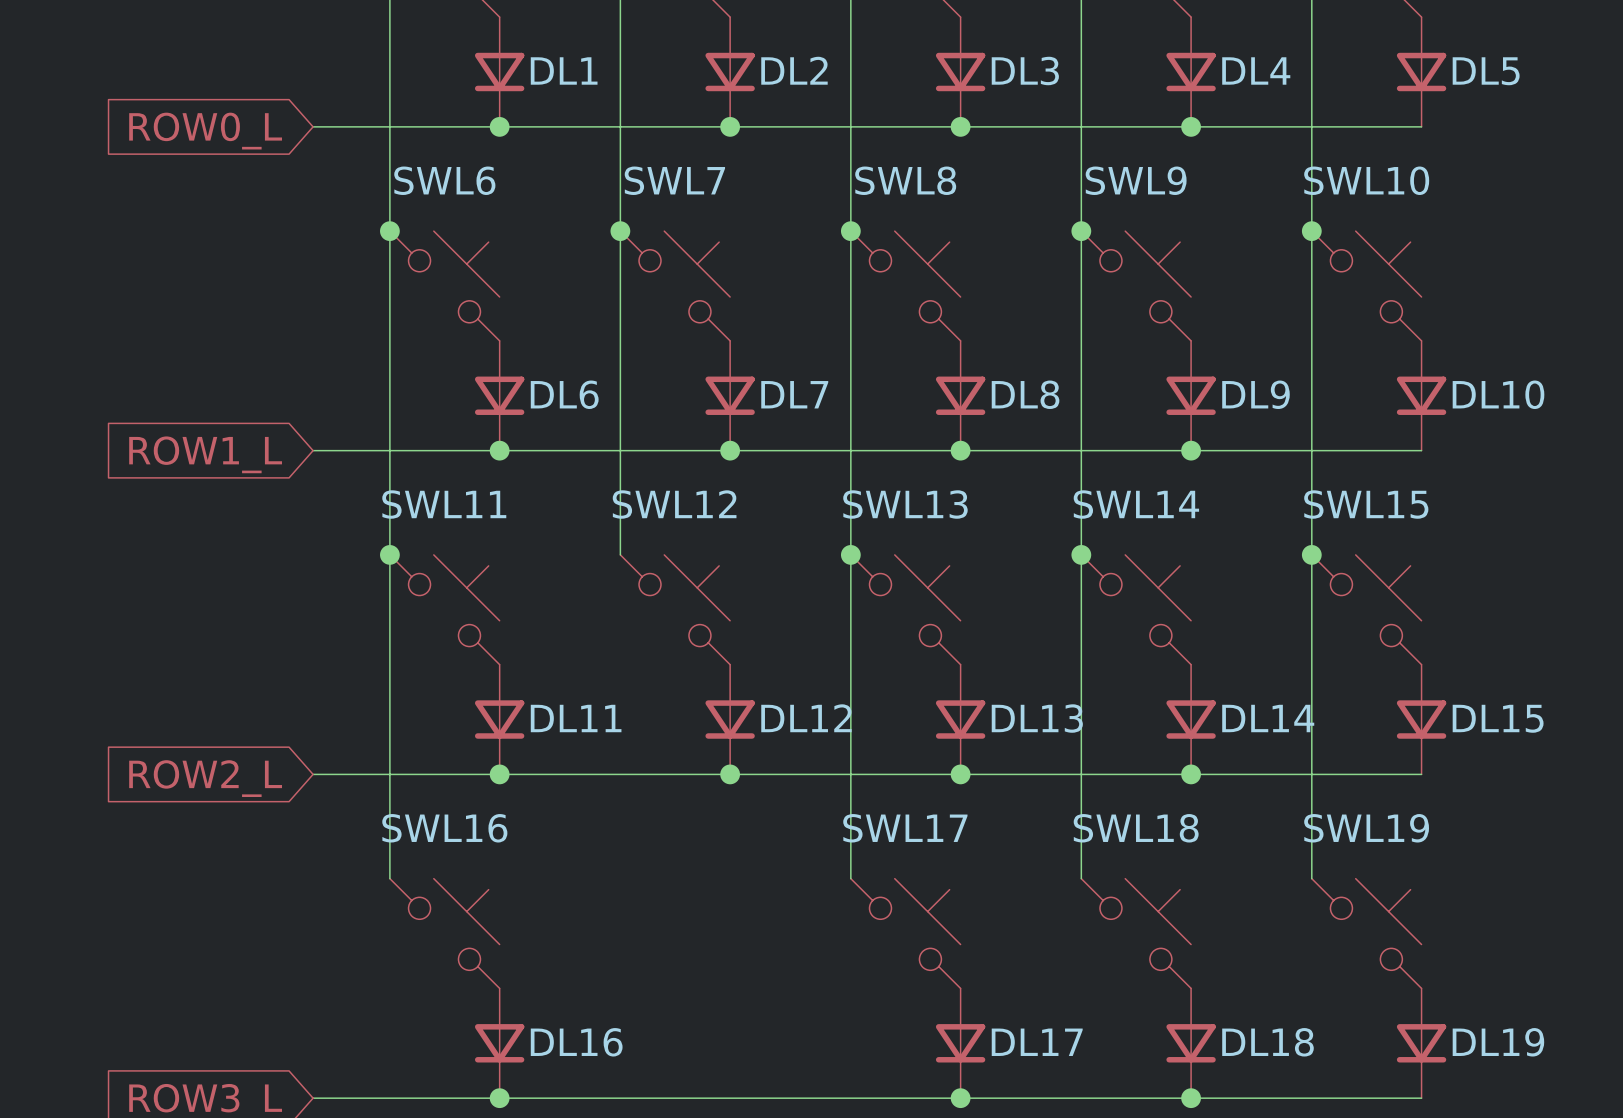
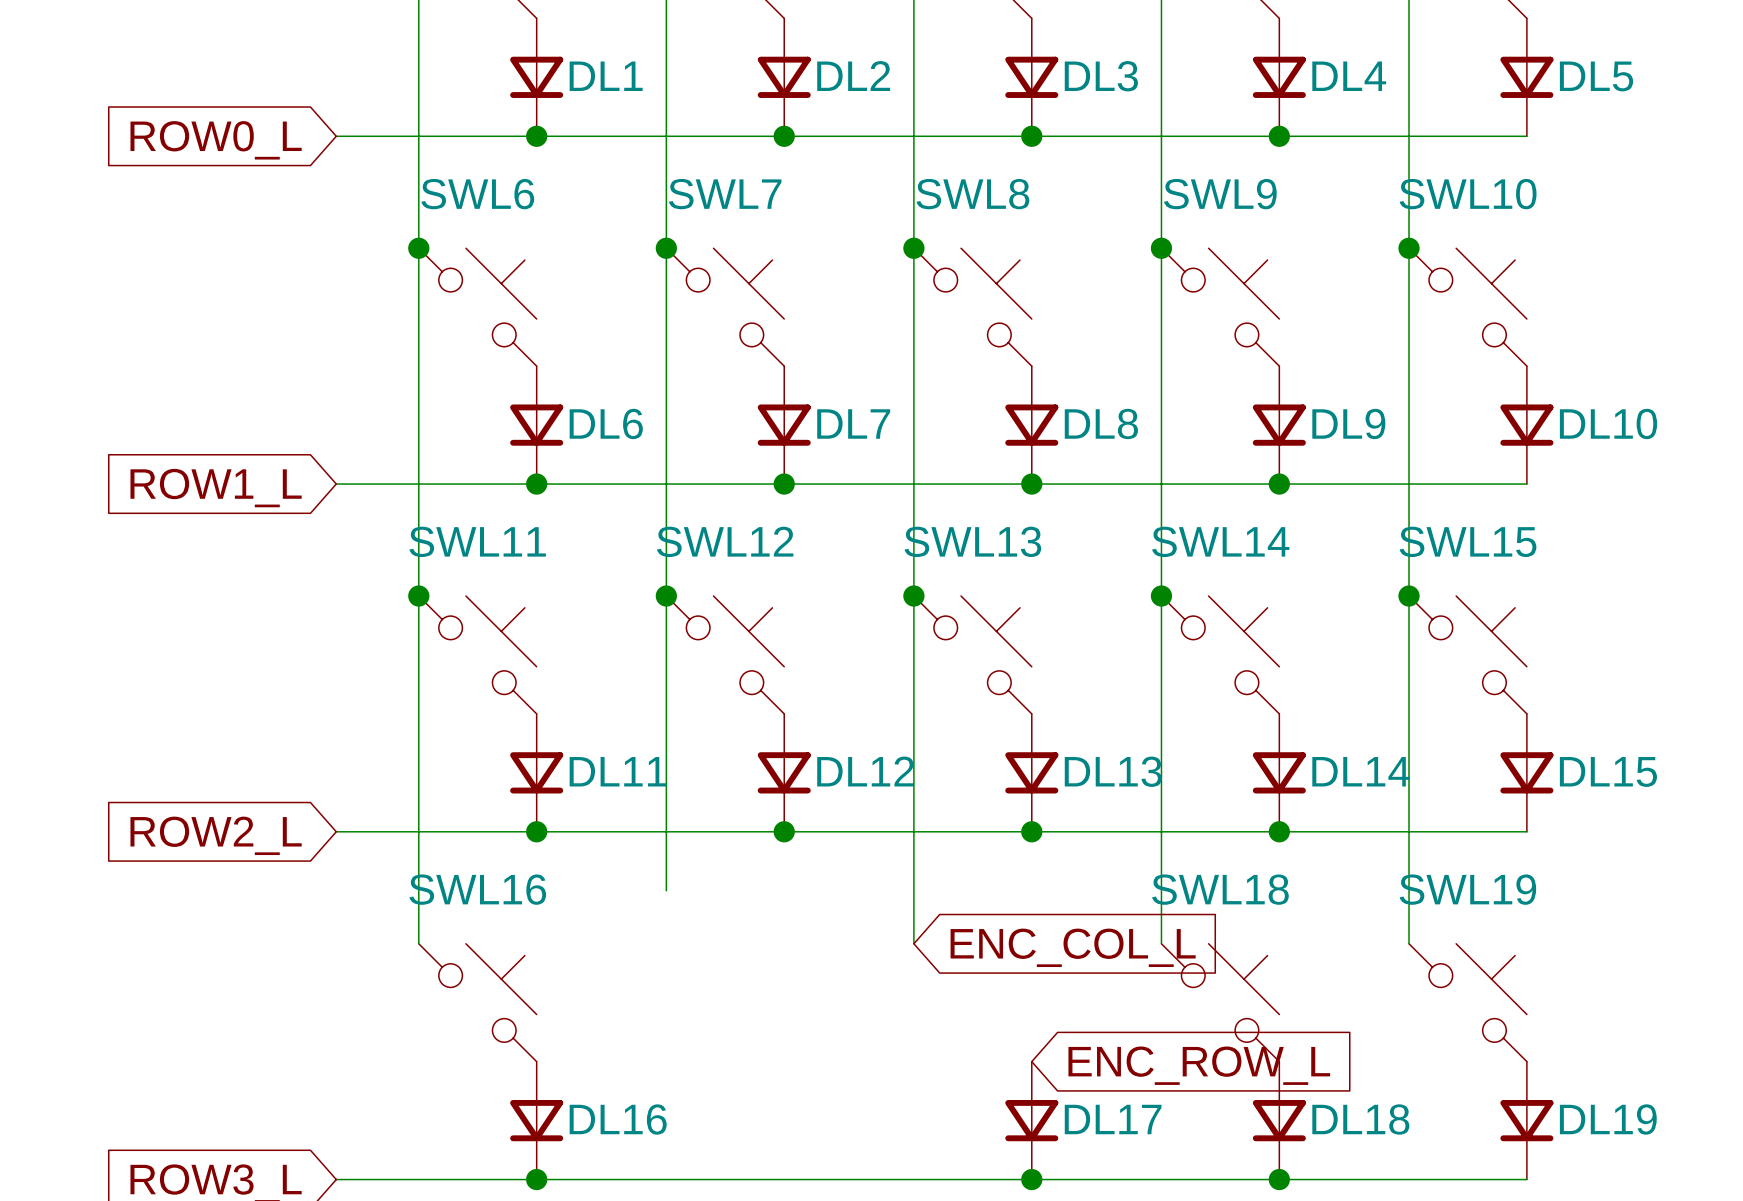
wire: none -> (666, 596) (666, 890)
junction: none -> (666, 596)
global label: none -> ENC_COL_L (1073, 947)
SWL17: (905, 933) -> none
global label: none -> ENC_ROW_L (1199, 1065)

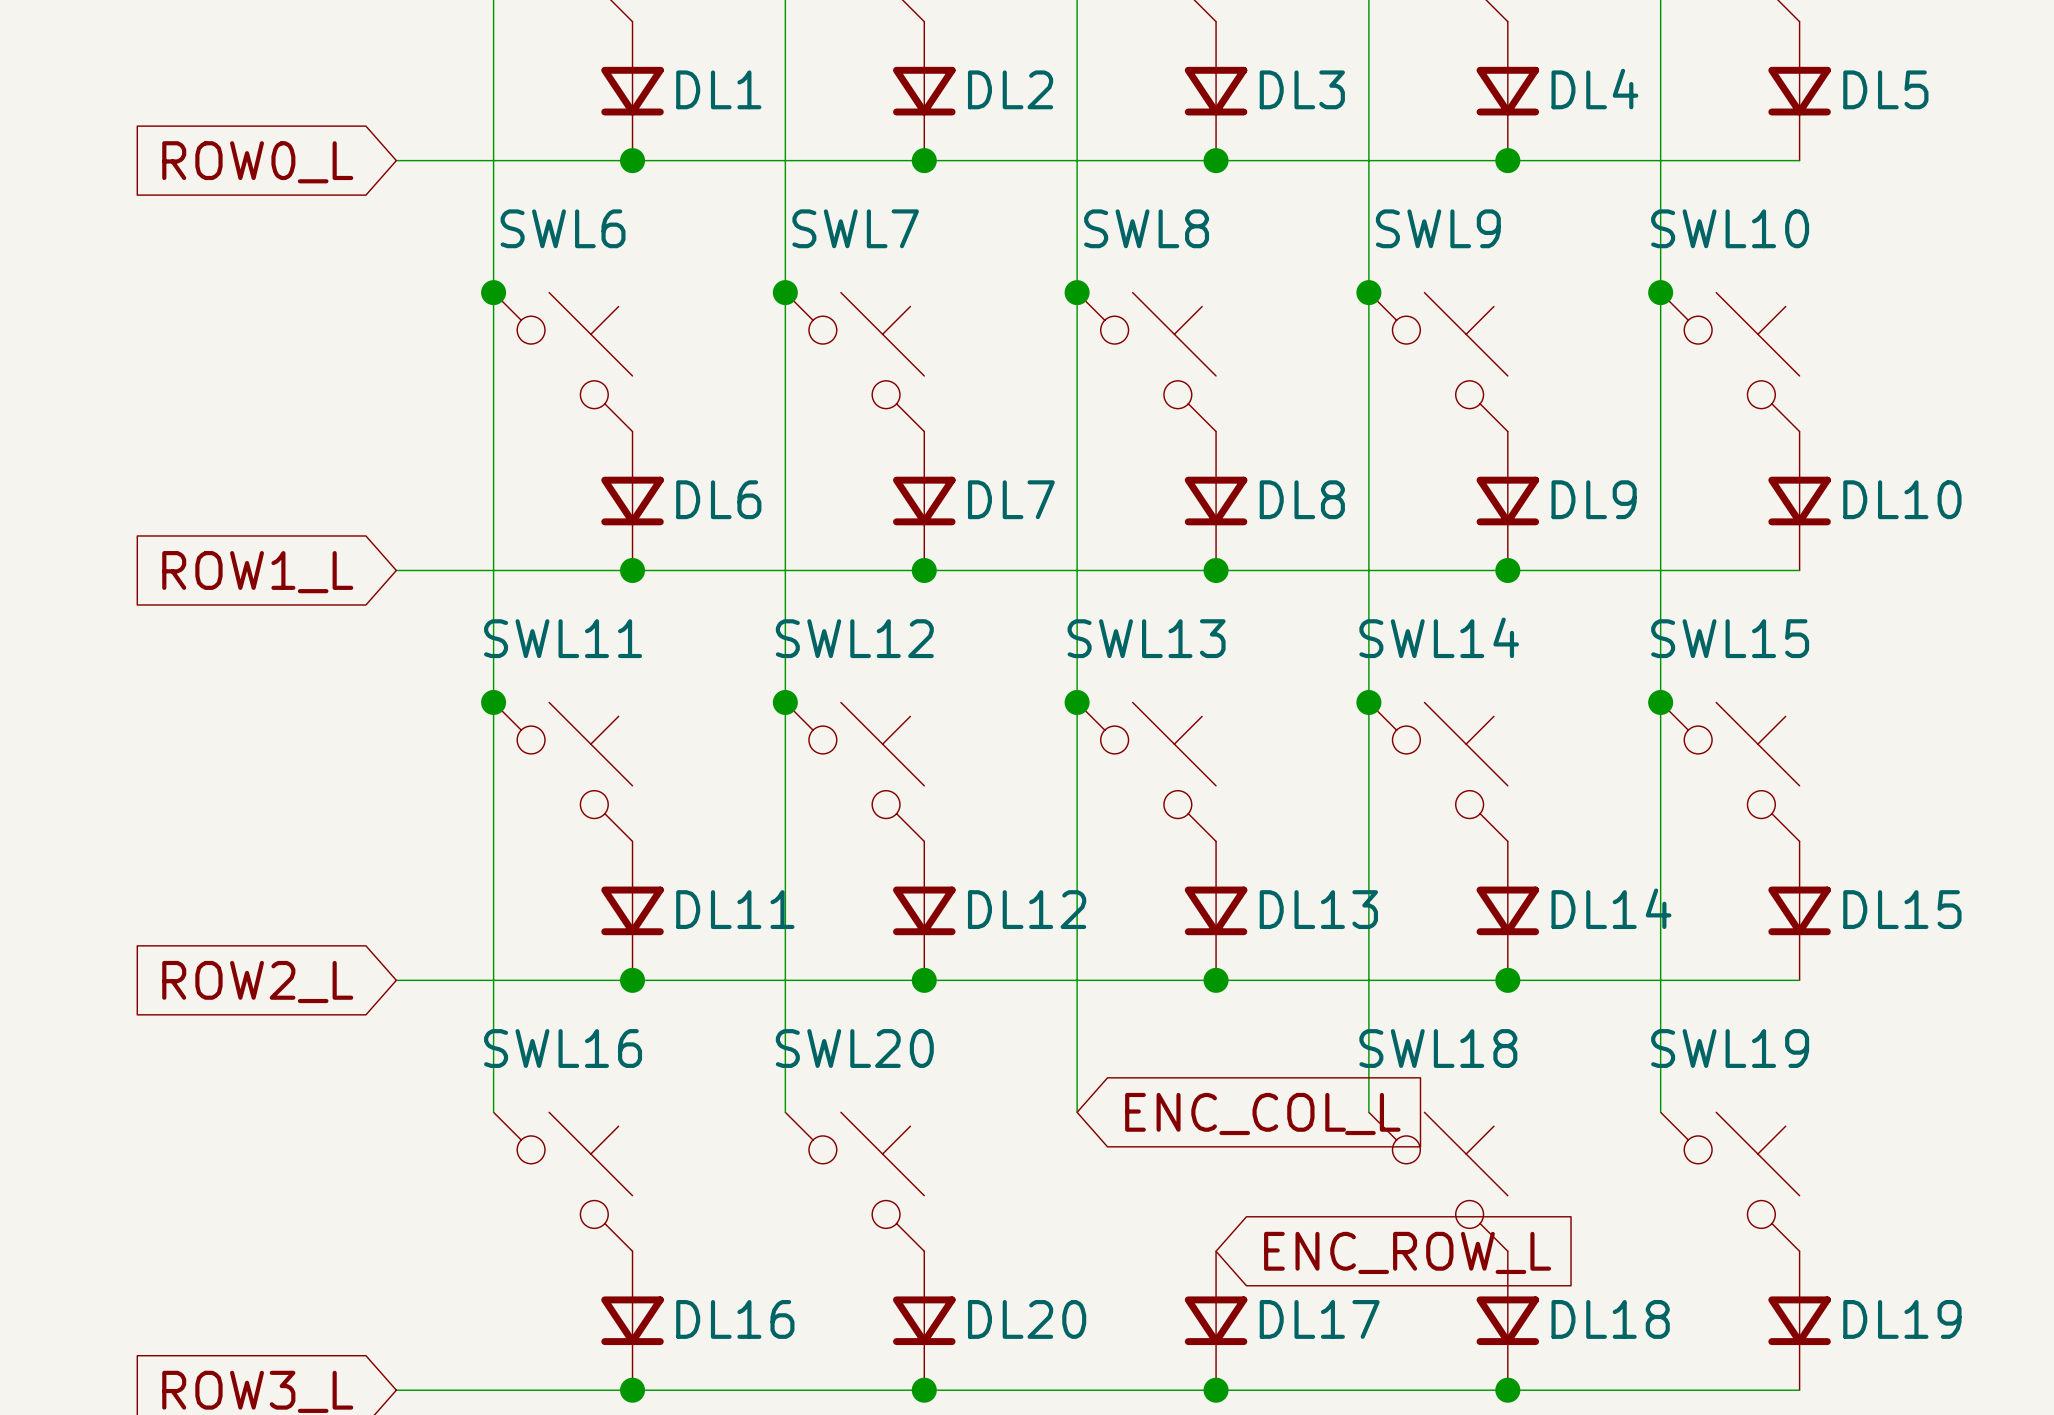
wire: none -> (785, 1049) (785, 1112)
SWL20: none -> (854, 1181)
DL20: none -> (924, 1320)
junction: none -> (924, 1390)

